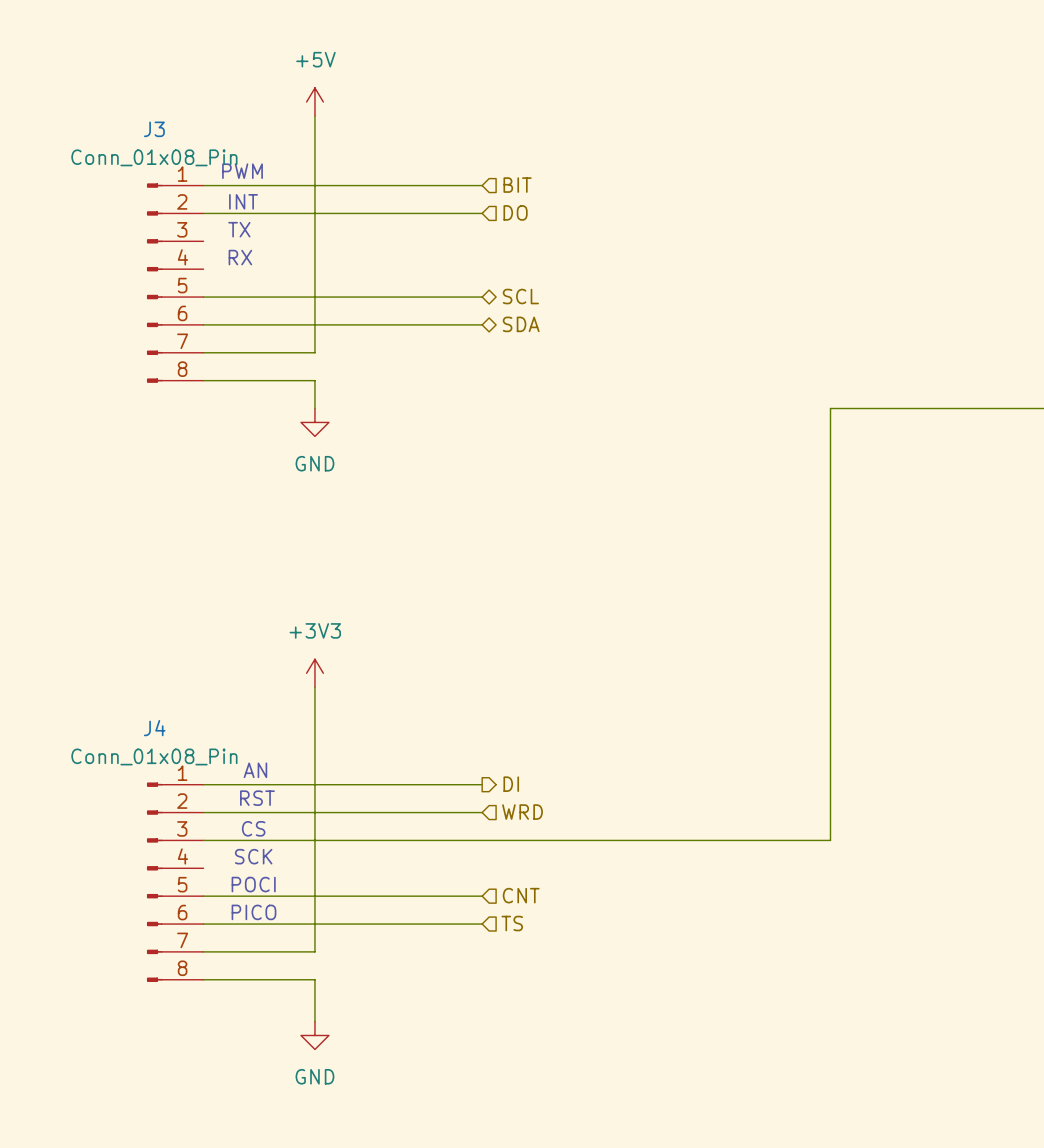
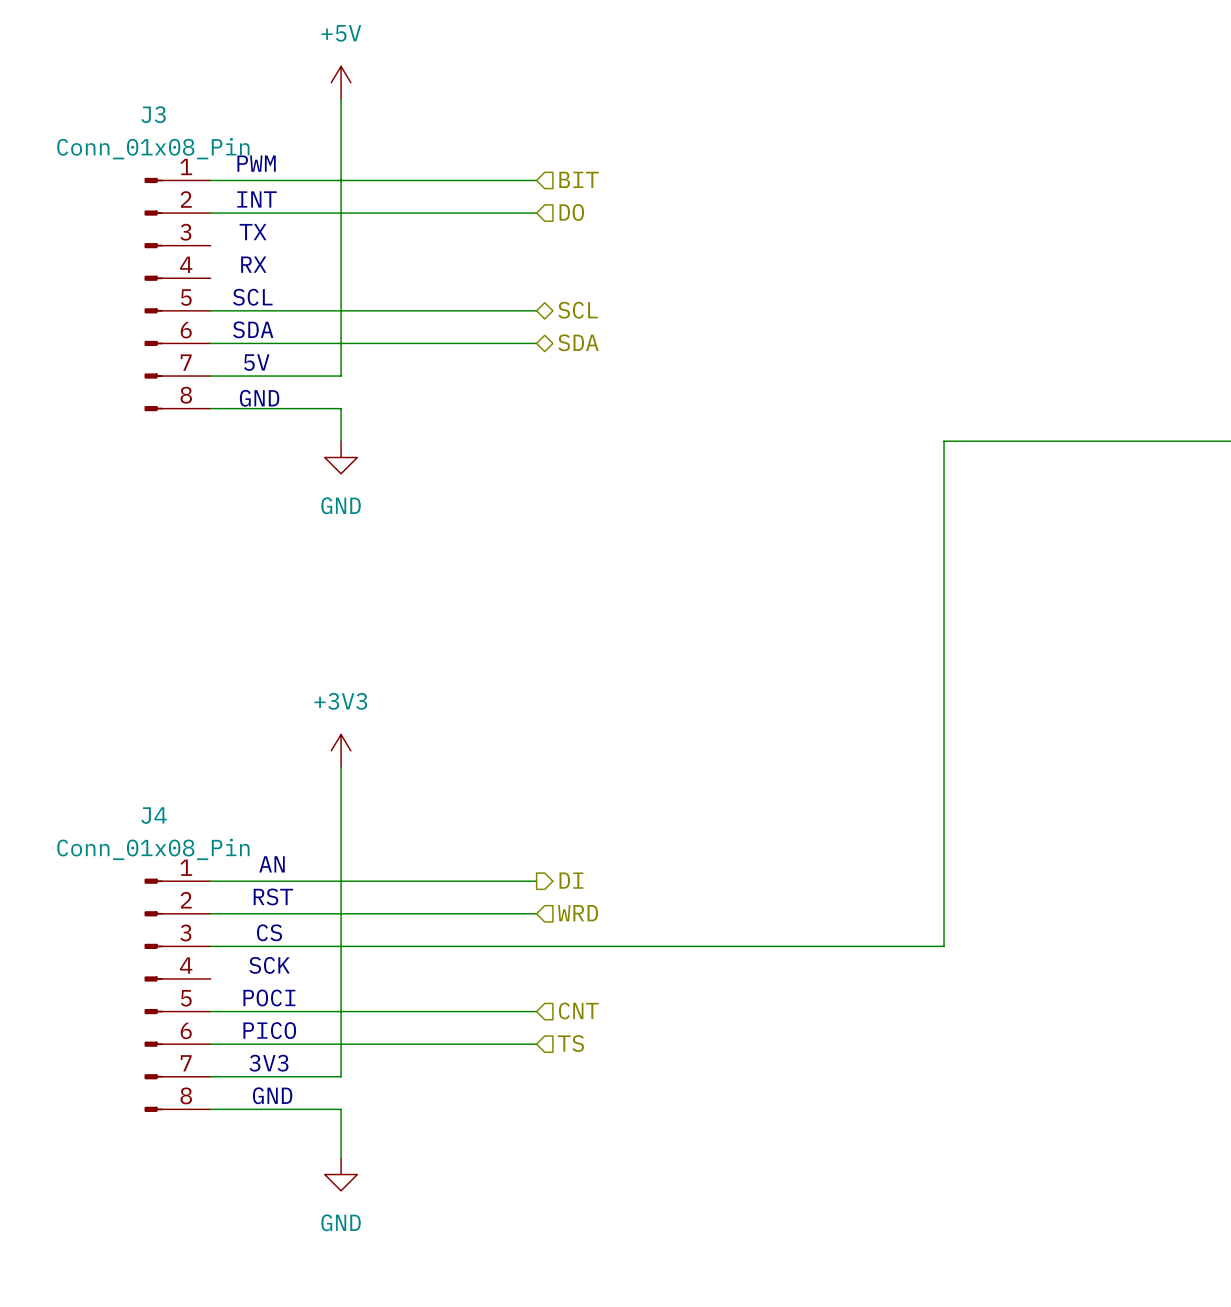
text: none -> SCL (252, 297)
text: none -> SDA (253, 329)
text: none -> 5V (256, 362)
text: none -> GND (259, 398)
text: none -> 3V3 (268, 1063)
text: none -> GND (272, 1095)

